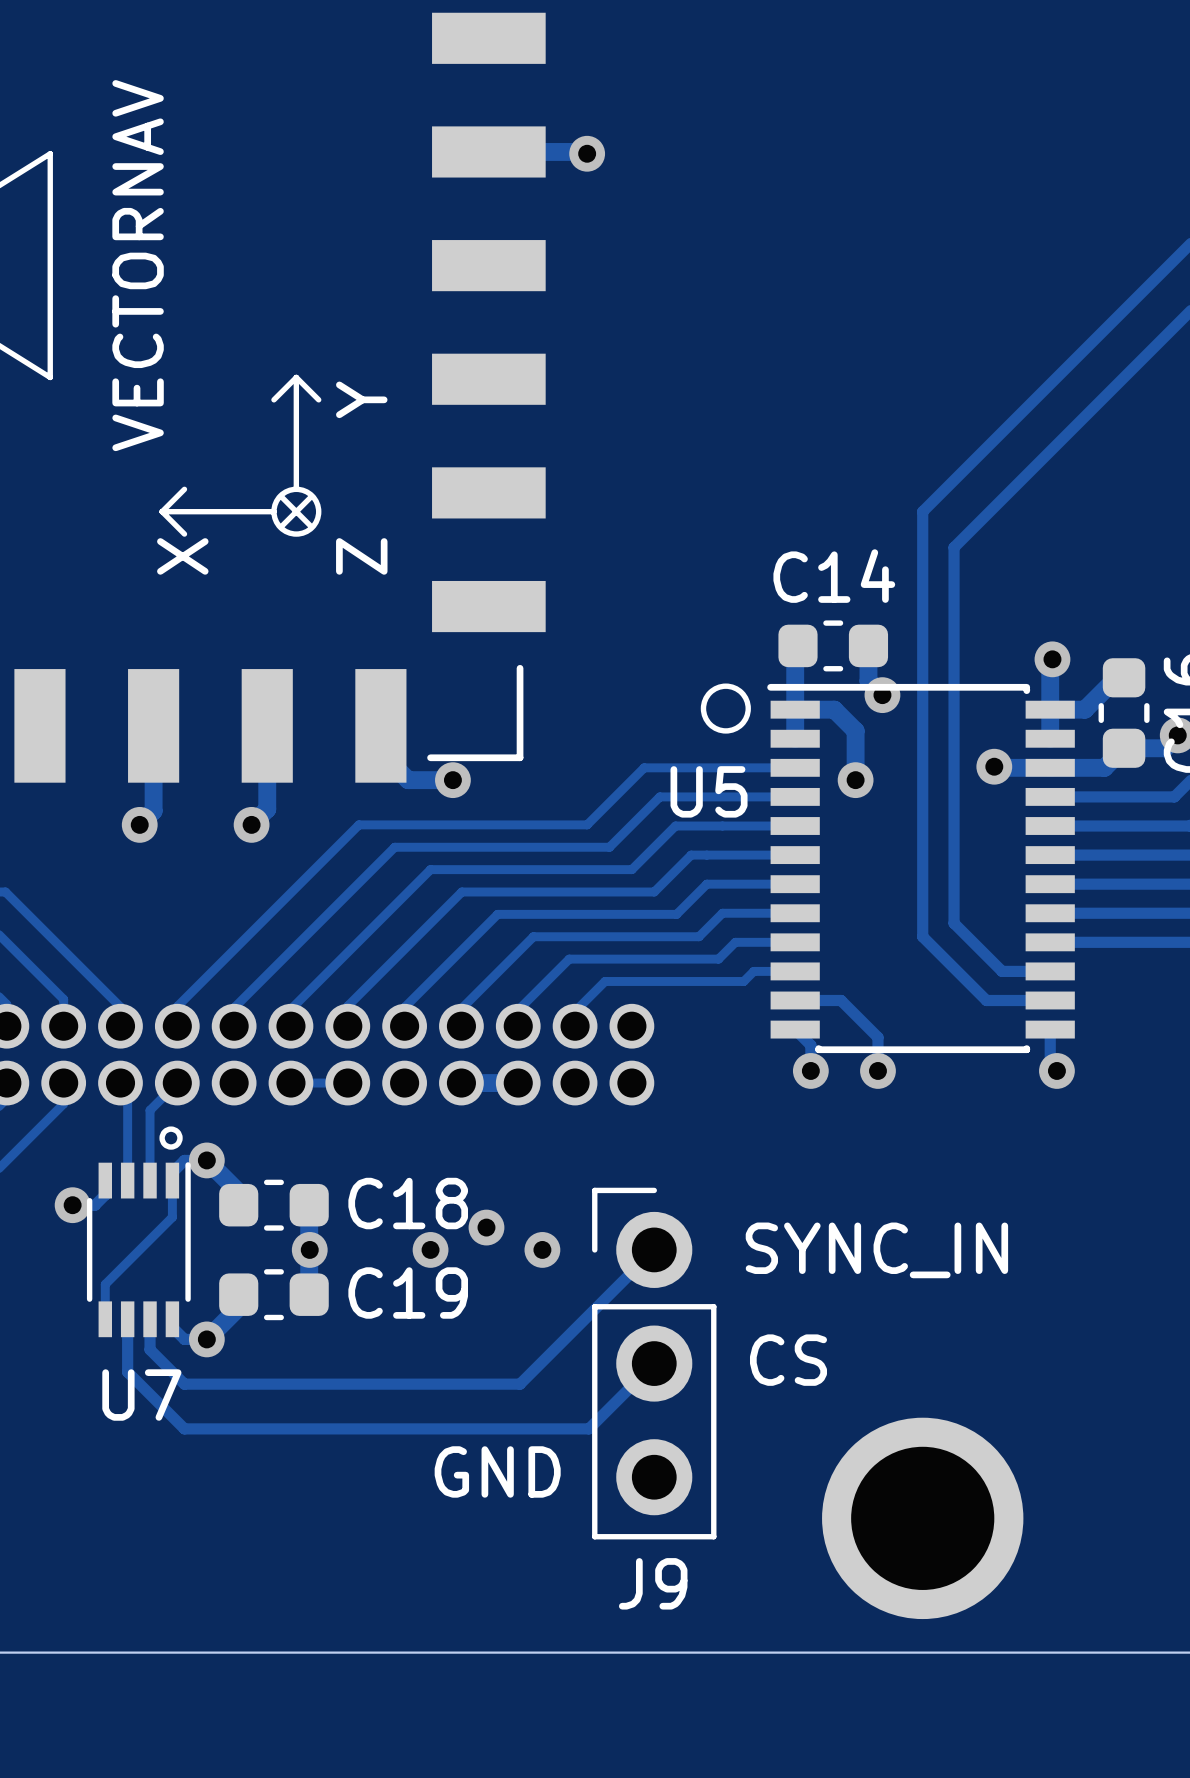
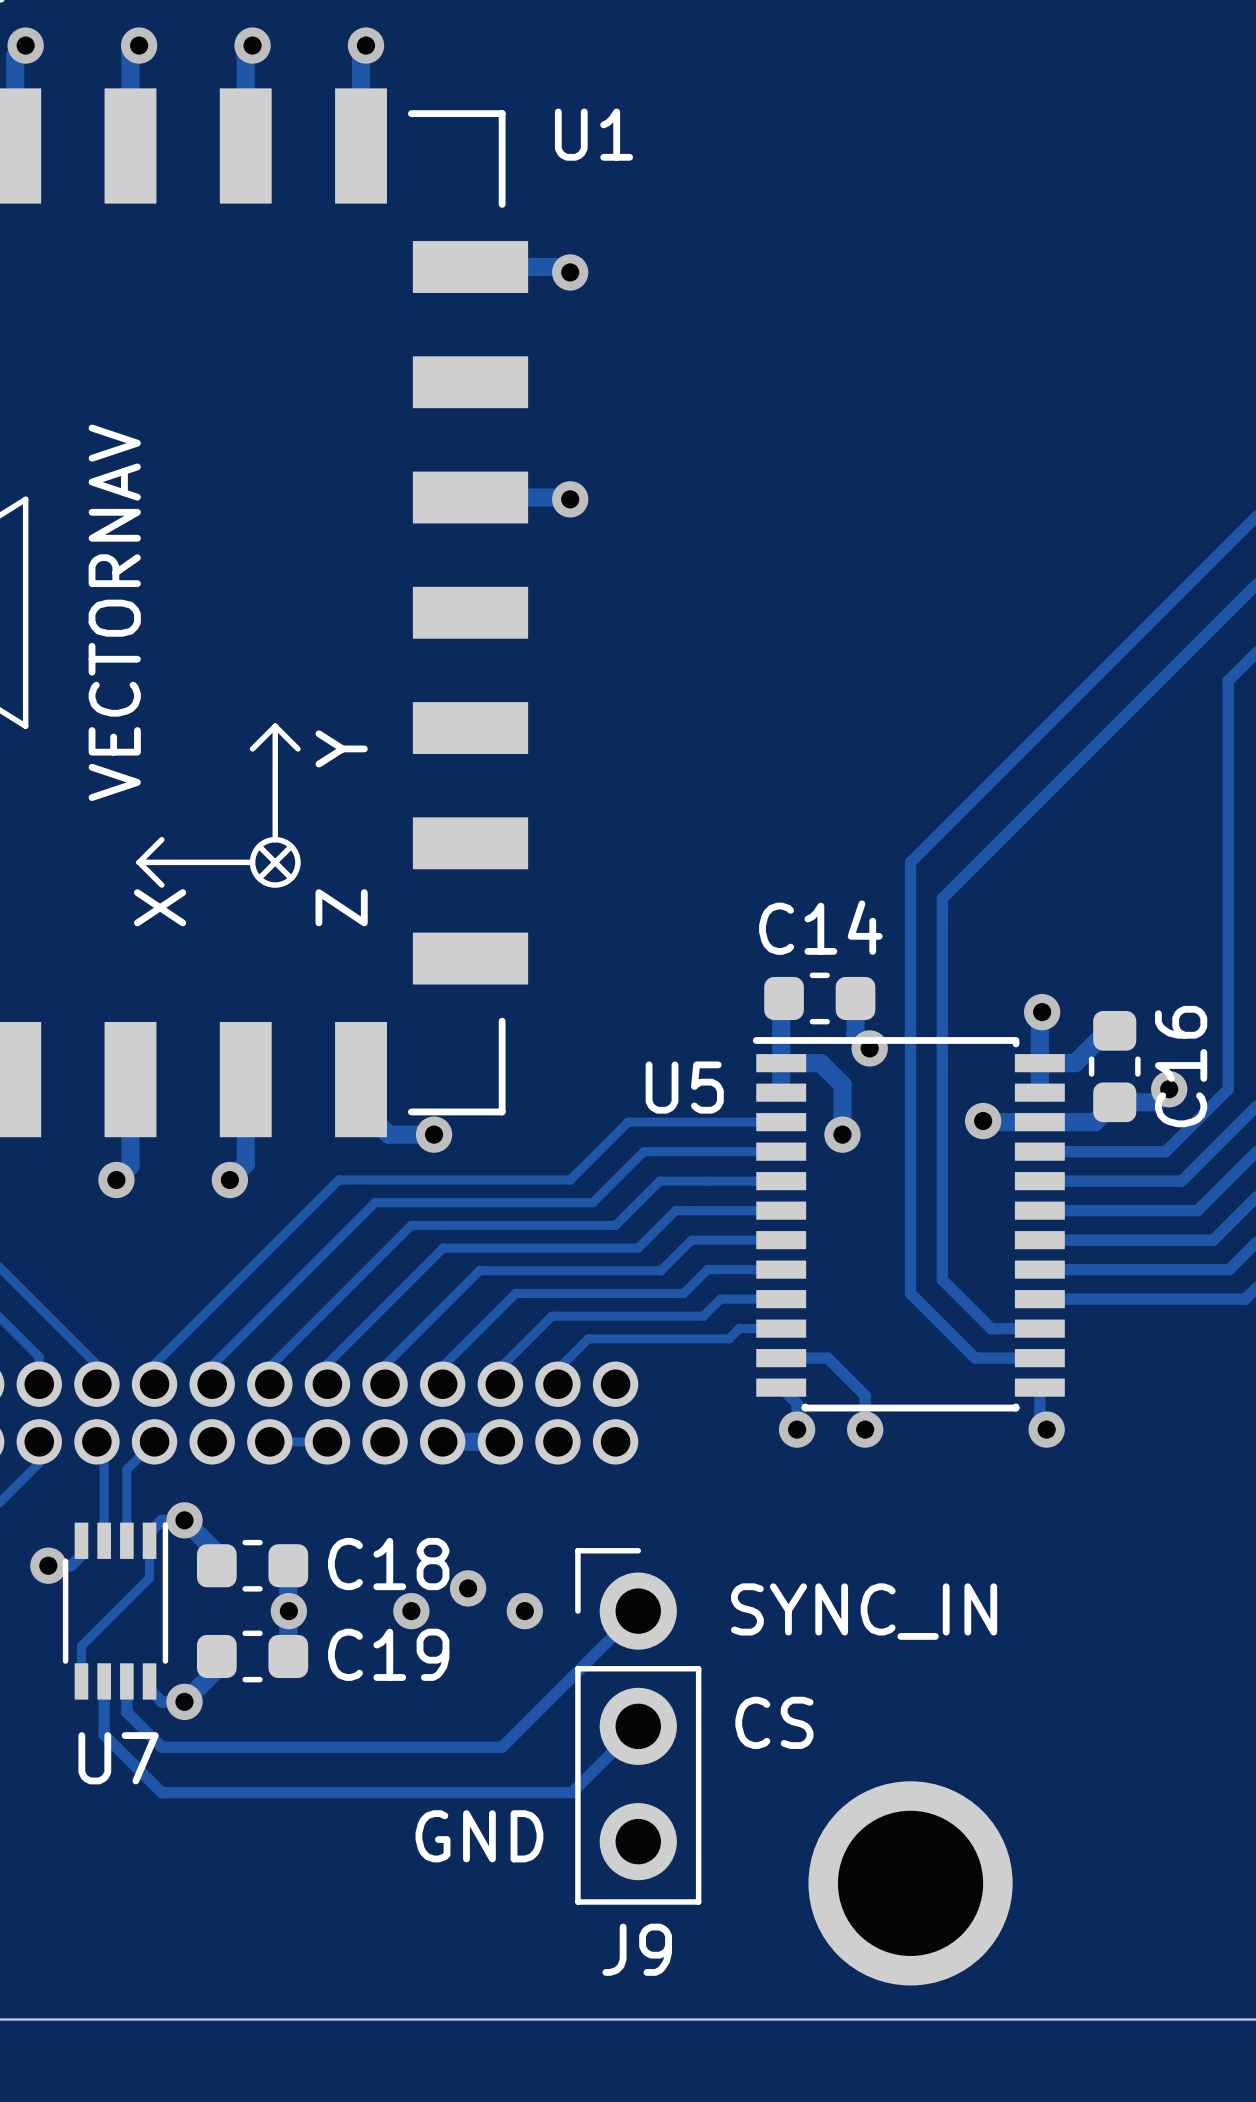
drawing: [700, 683, 751, 734] -> none
U5 name position: U5 (709, 791) -> U5 (684, 1087)
drawing: [159, 1126, 183, 1150] -> none

